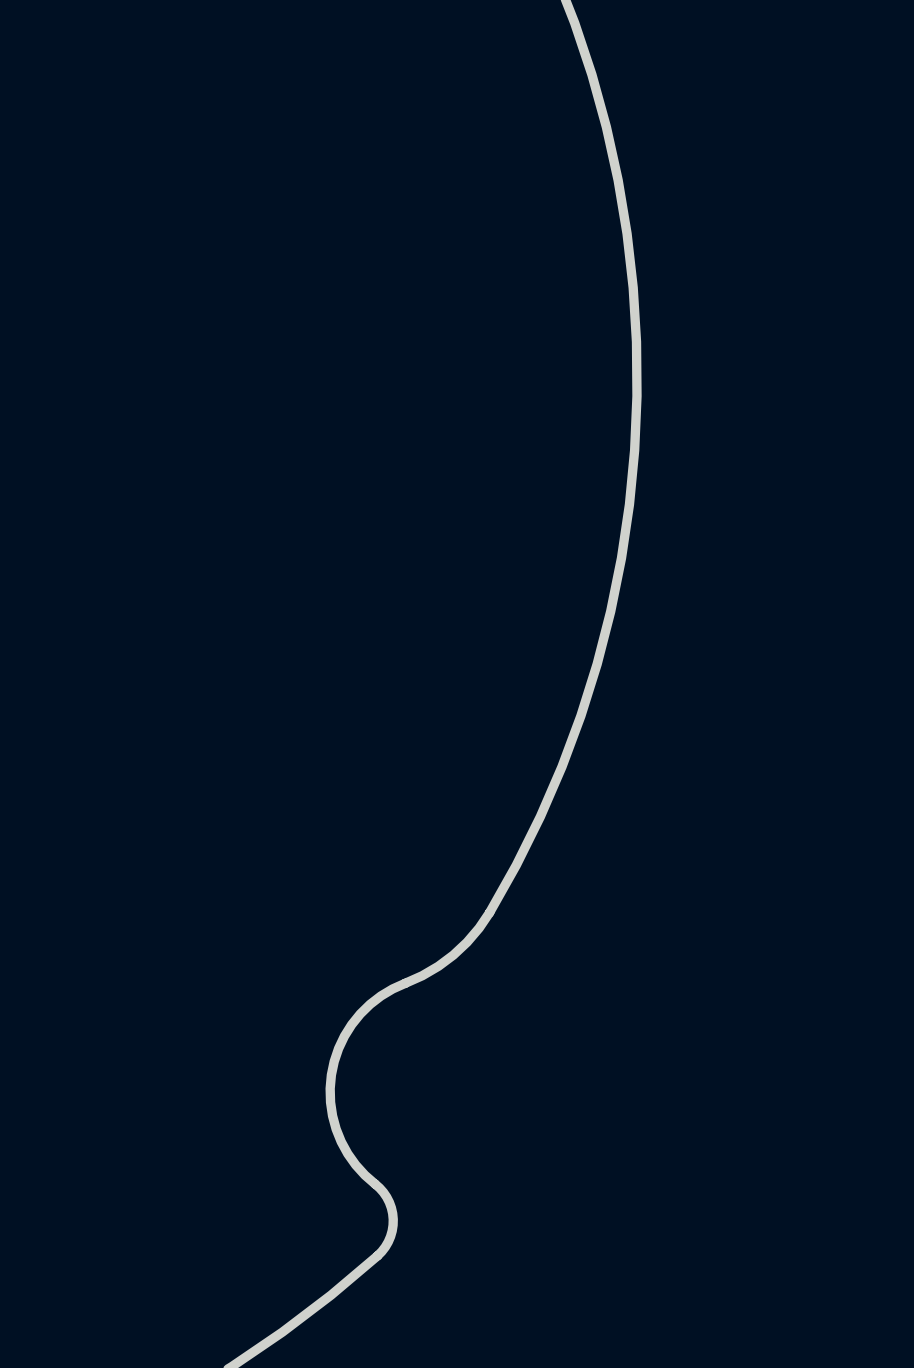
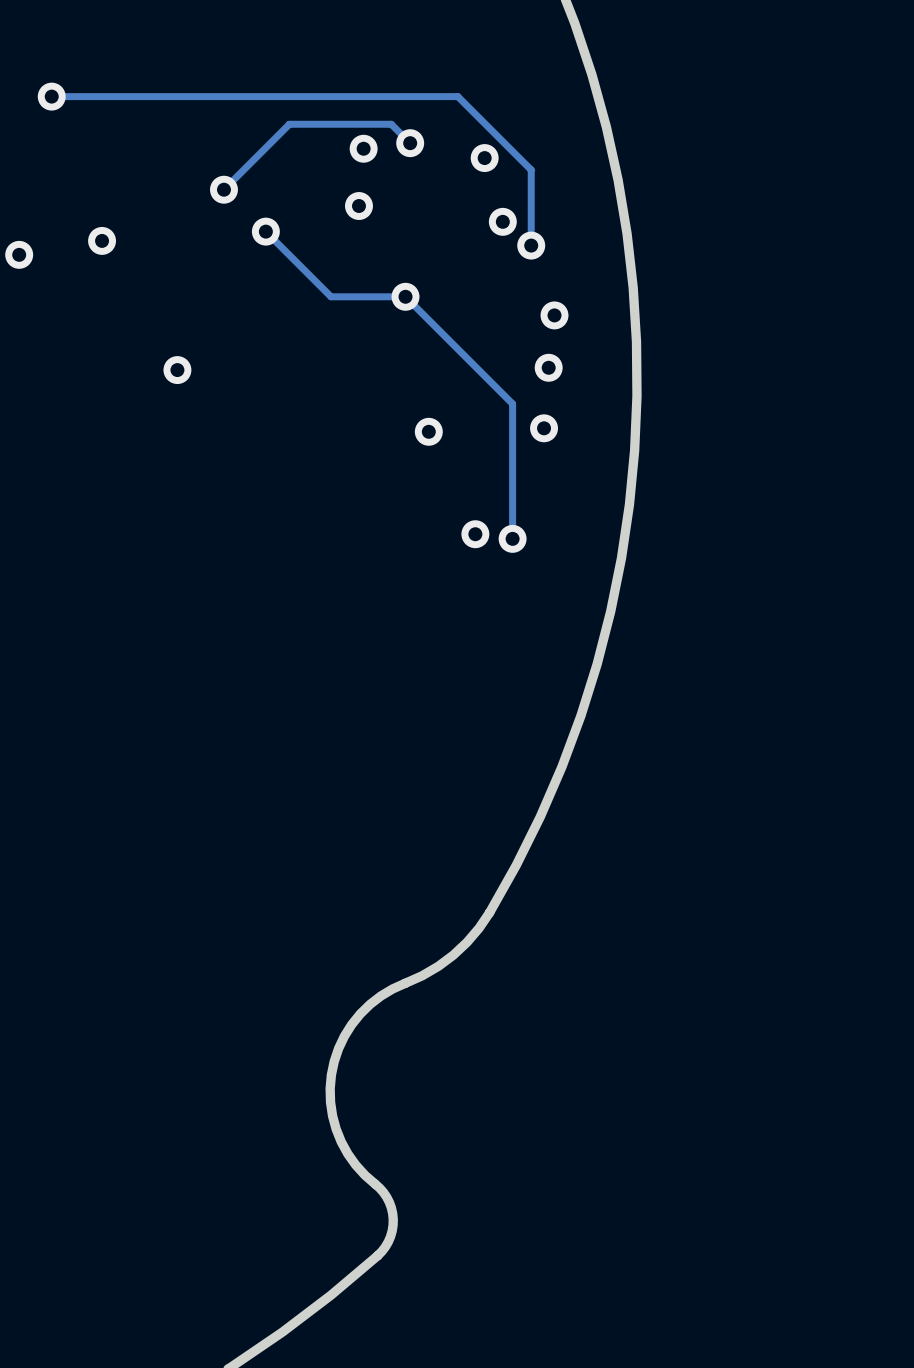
track: none -> (51, 96) (457, 96) (531, 169) (531, 245)
via: none -> (51, 96)
track: none -> (410, 143) (391, 124) (289, 124) (223, 189)
via: none -> (410, 143)
via: none -> (363, 148)
via: none -> (484, 158)
via: none -> (223, 189)
via: none -> (358, 206)
via: none -> (502, 221)
track: none -> (265, 231) (331, 296) (405, 296) (512, 403) (512, 538)
via: none -> (265, 231)
via: none -> (102, 240)
via: none -> (531, 245)
via: none -> (19, 254)
via: none -> (405, 296)
via: none -> (554, 315)
via: none -> (548, 367)
via: none -> (177, 370)
via: none -> (544, 428)
via: none -> (428, 431)
via: none -> (475, 534)
via: none -> (512, 538)

